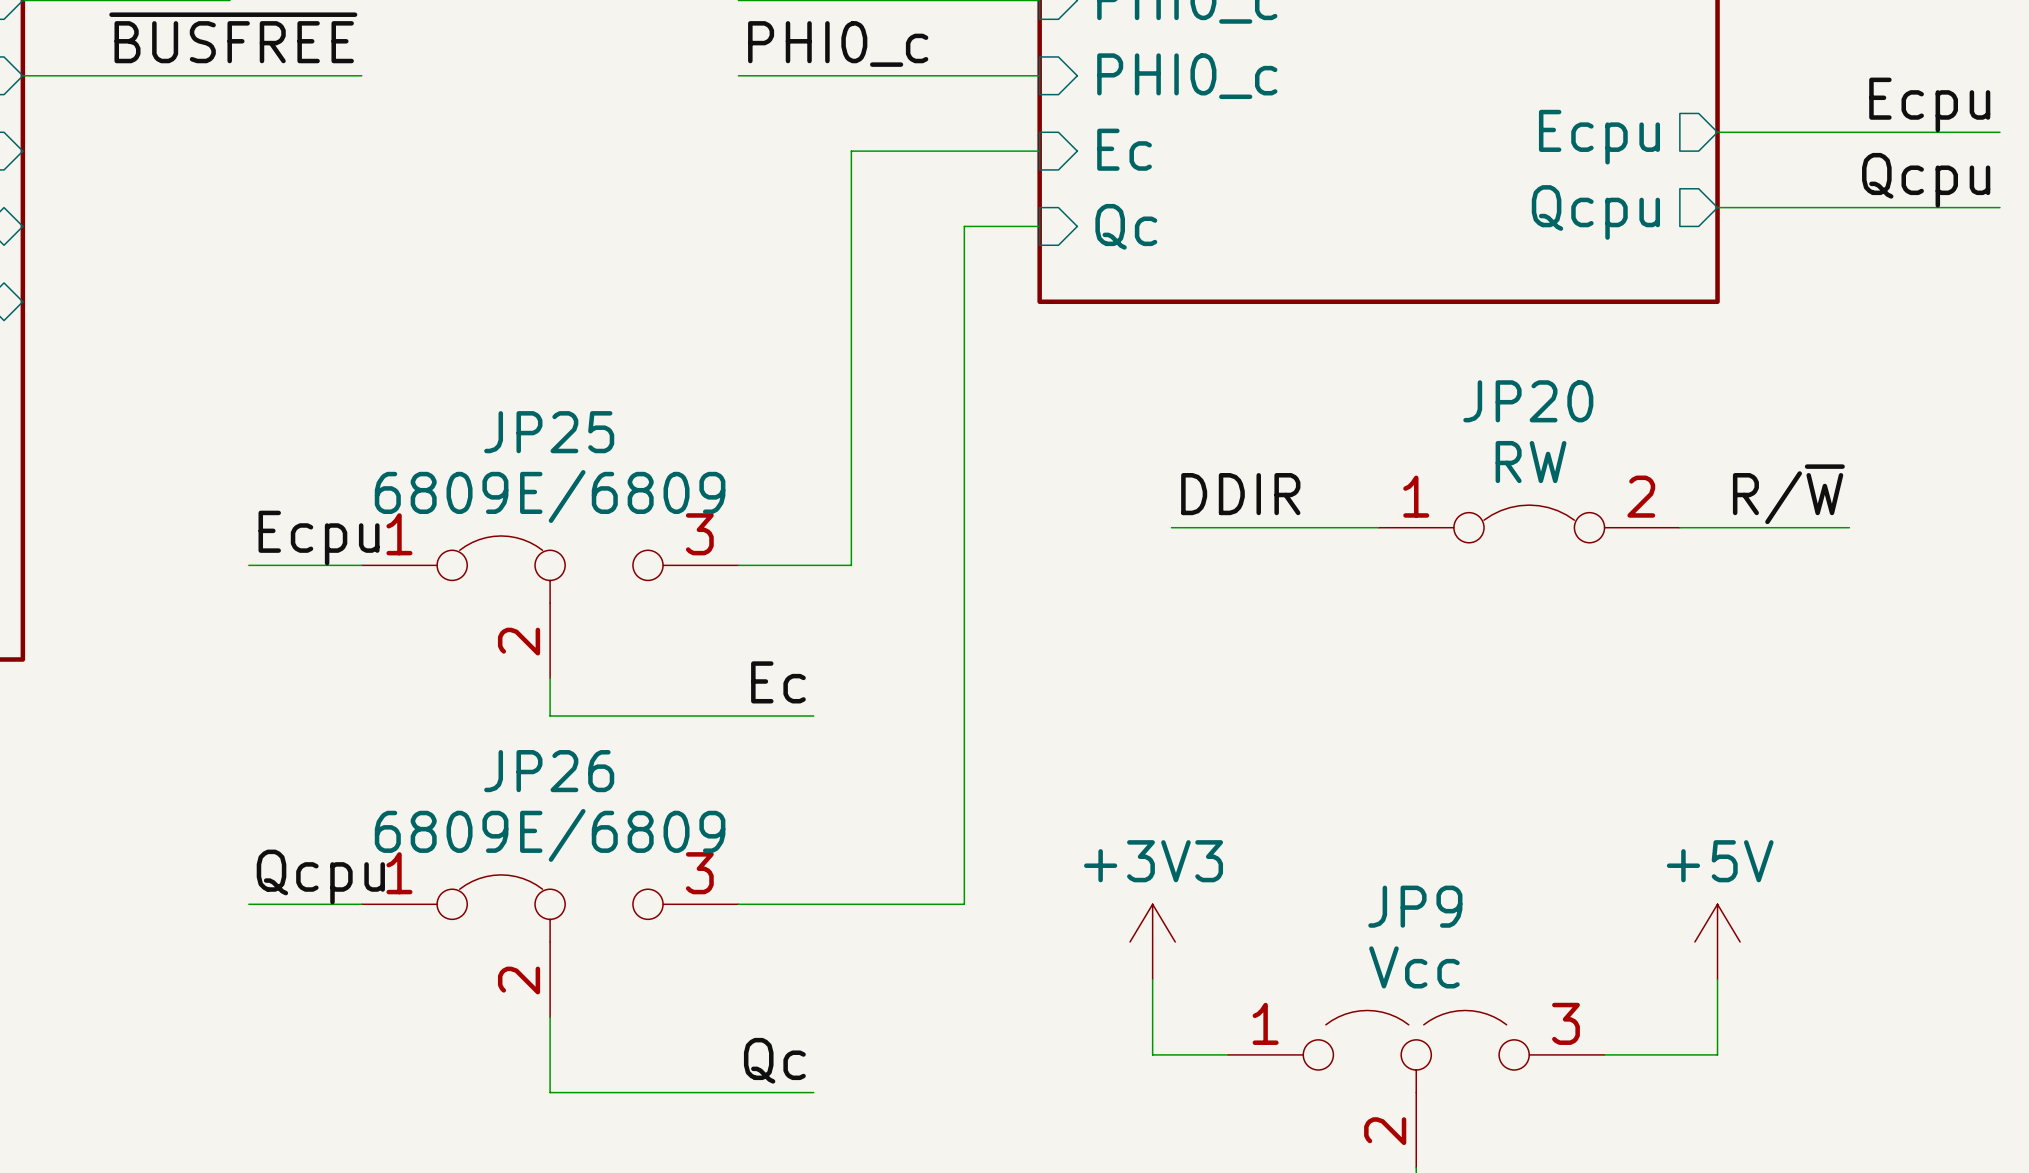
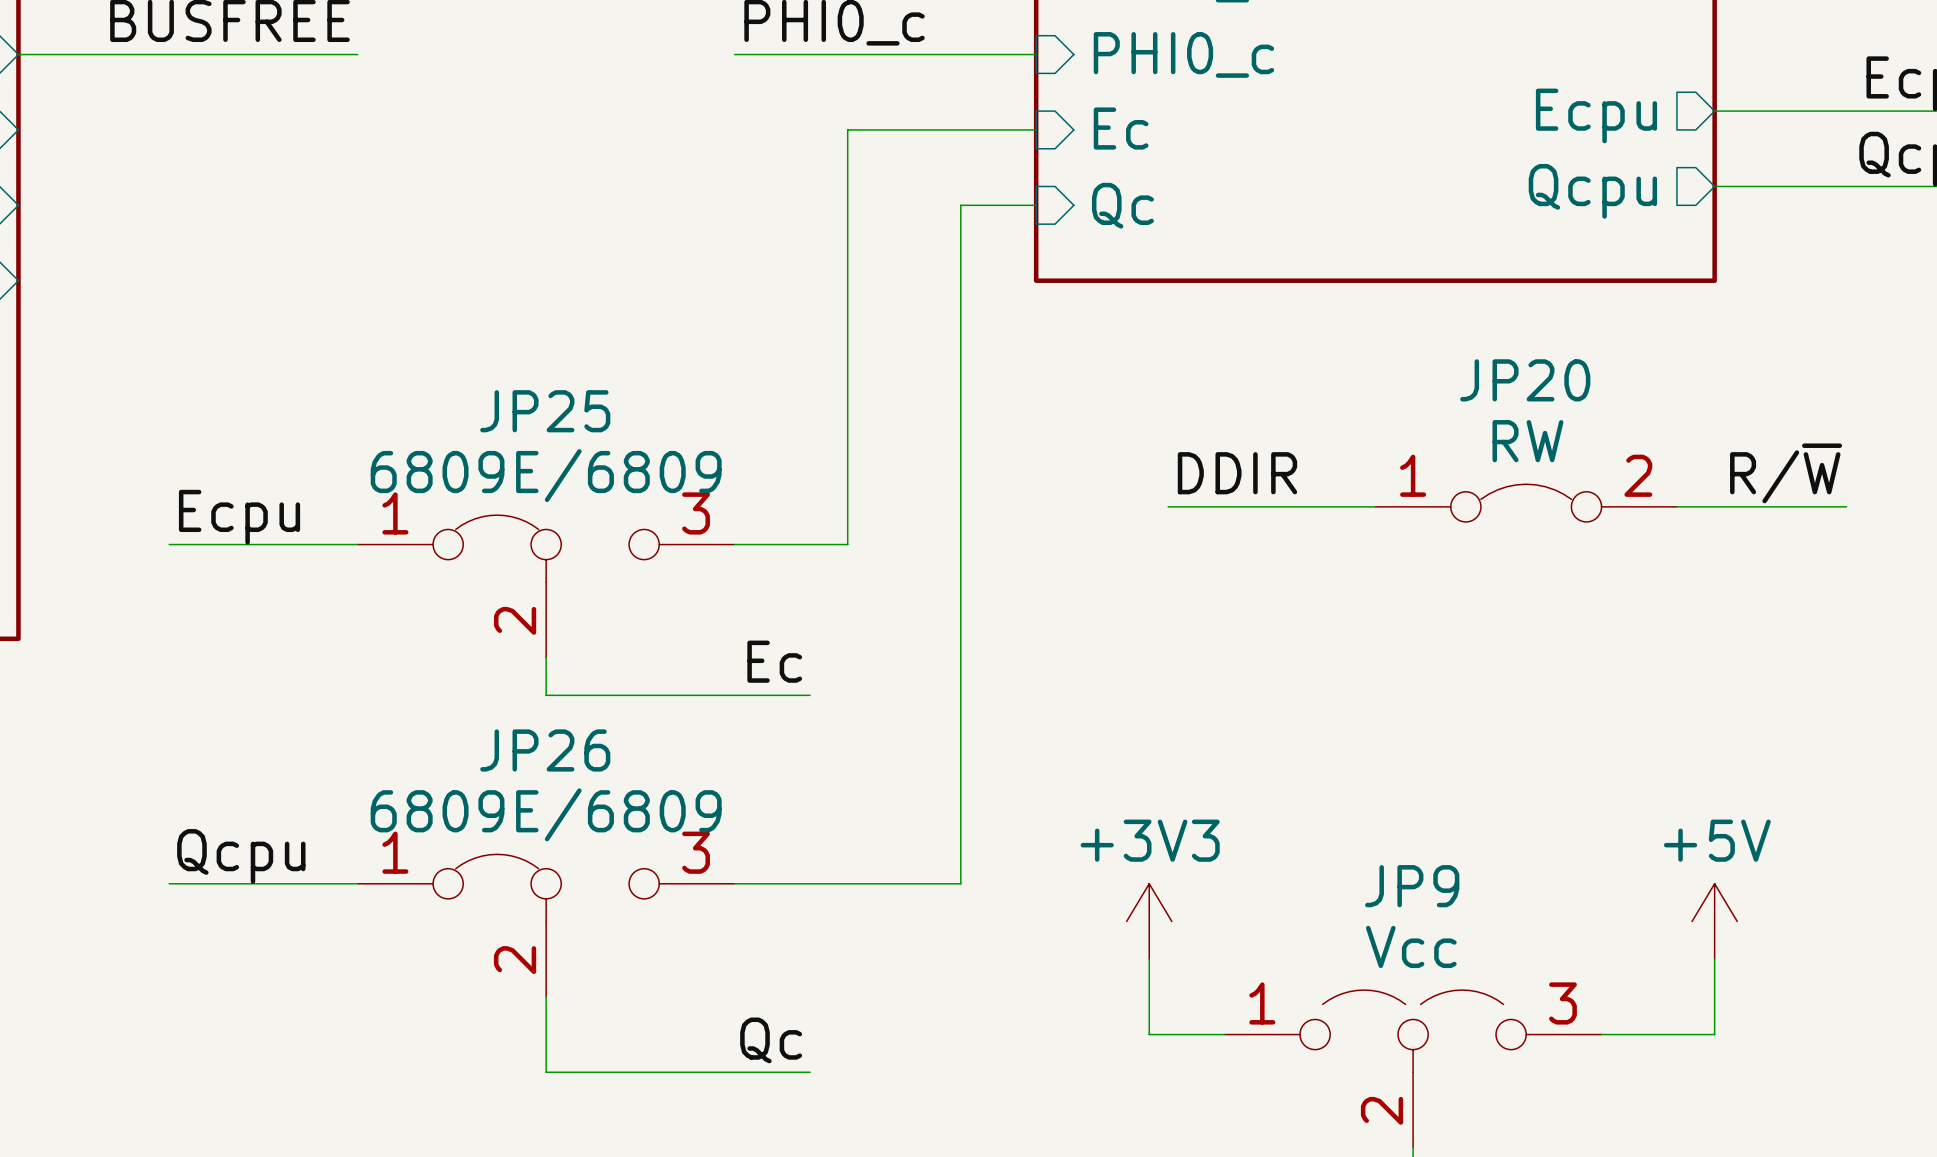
label position: Ecpu (319, 538) -> Ecpu (239, 517)
wire: none -> (169, 544) (244, 544)
label position: Qcpu (320, 876) -> Qcpu (241, 856)
wire: none -> (169, 883) (244, 883)

